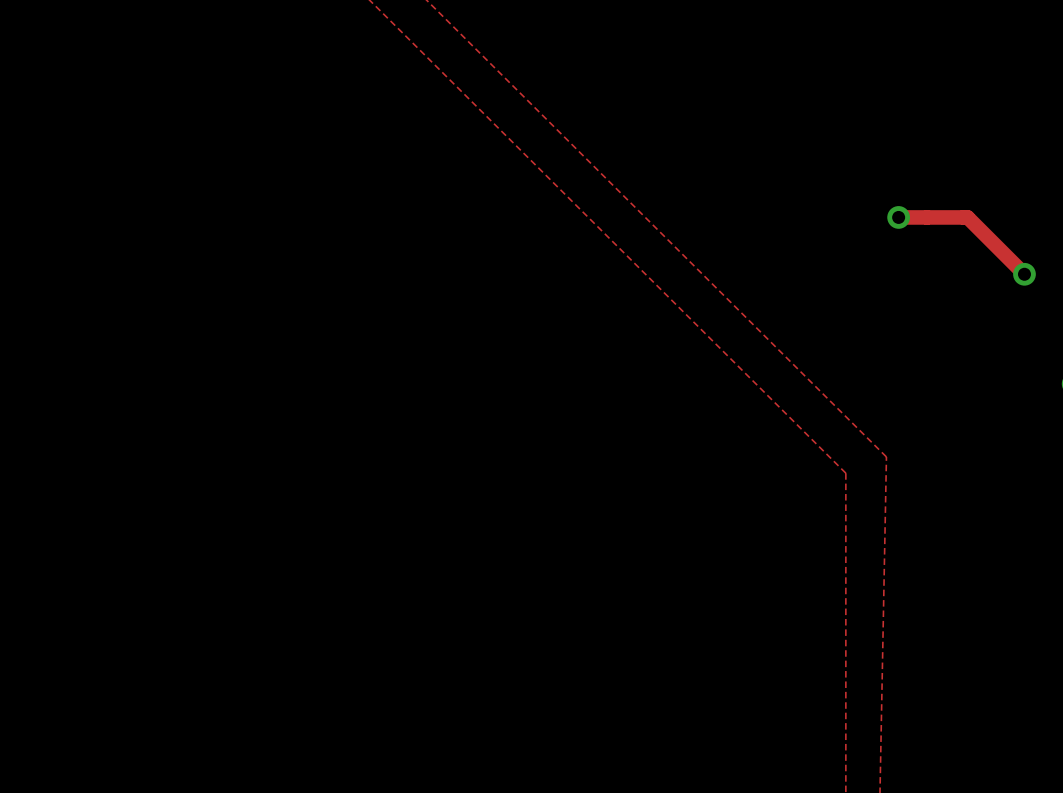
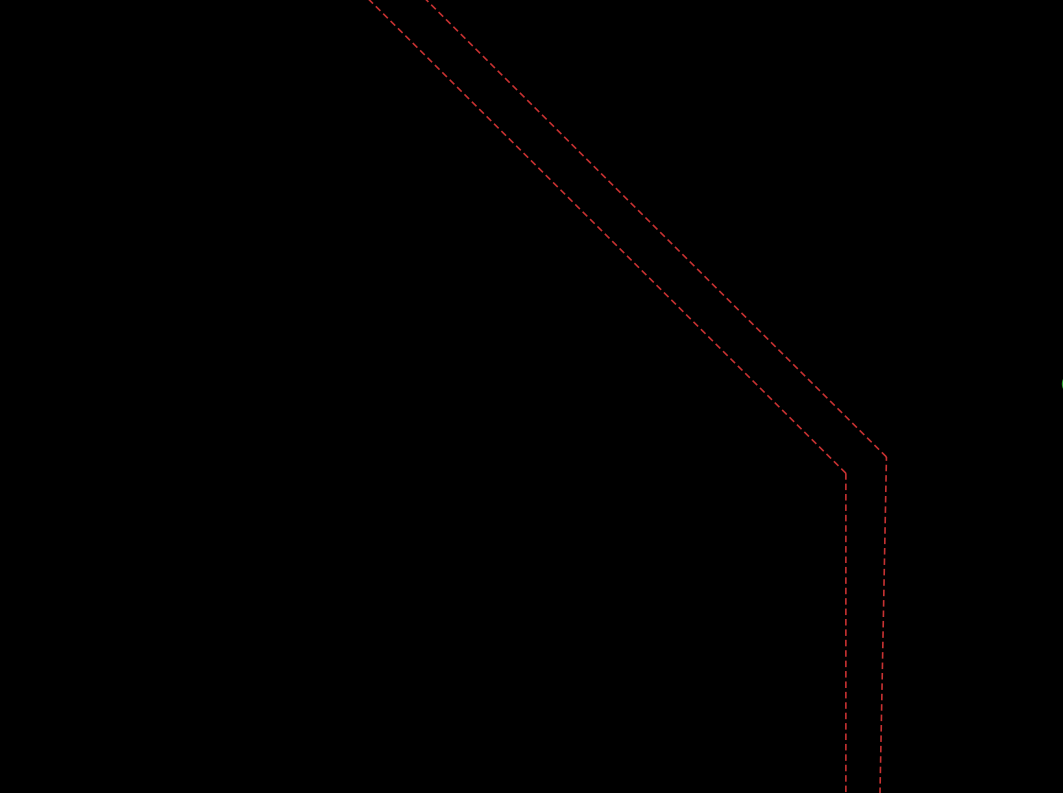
track: (898, 217) (967, 217) (1024, 274) -> none
via: (898, 217) -> none
via: (1024, 274) -> none

